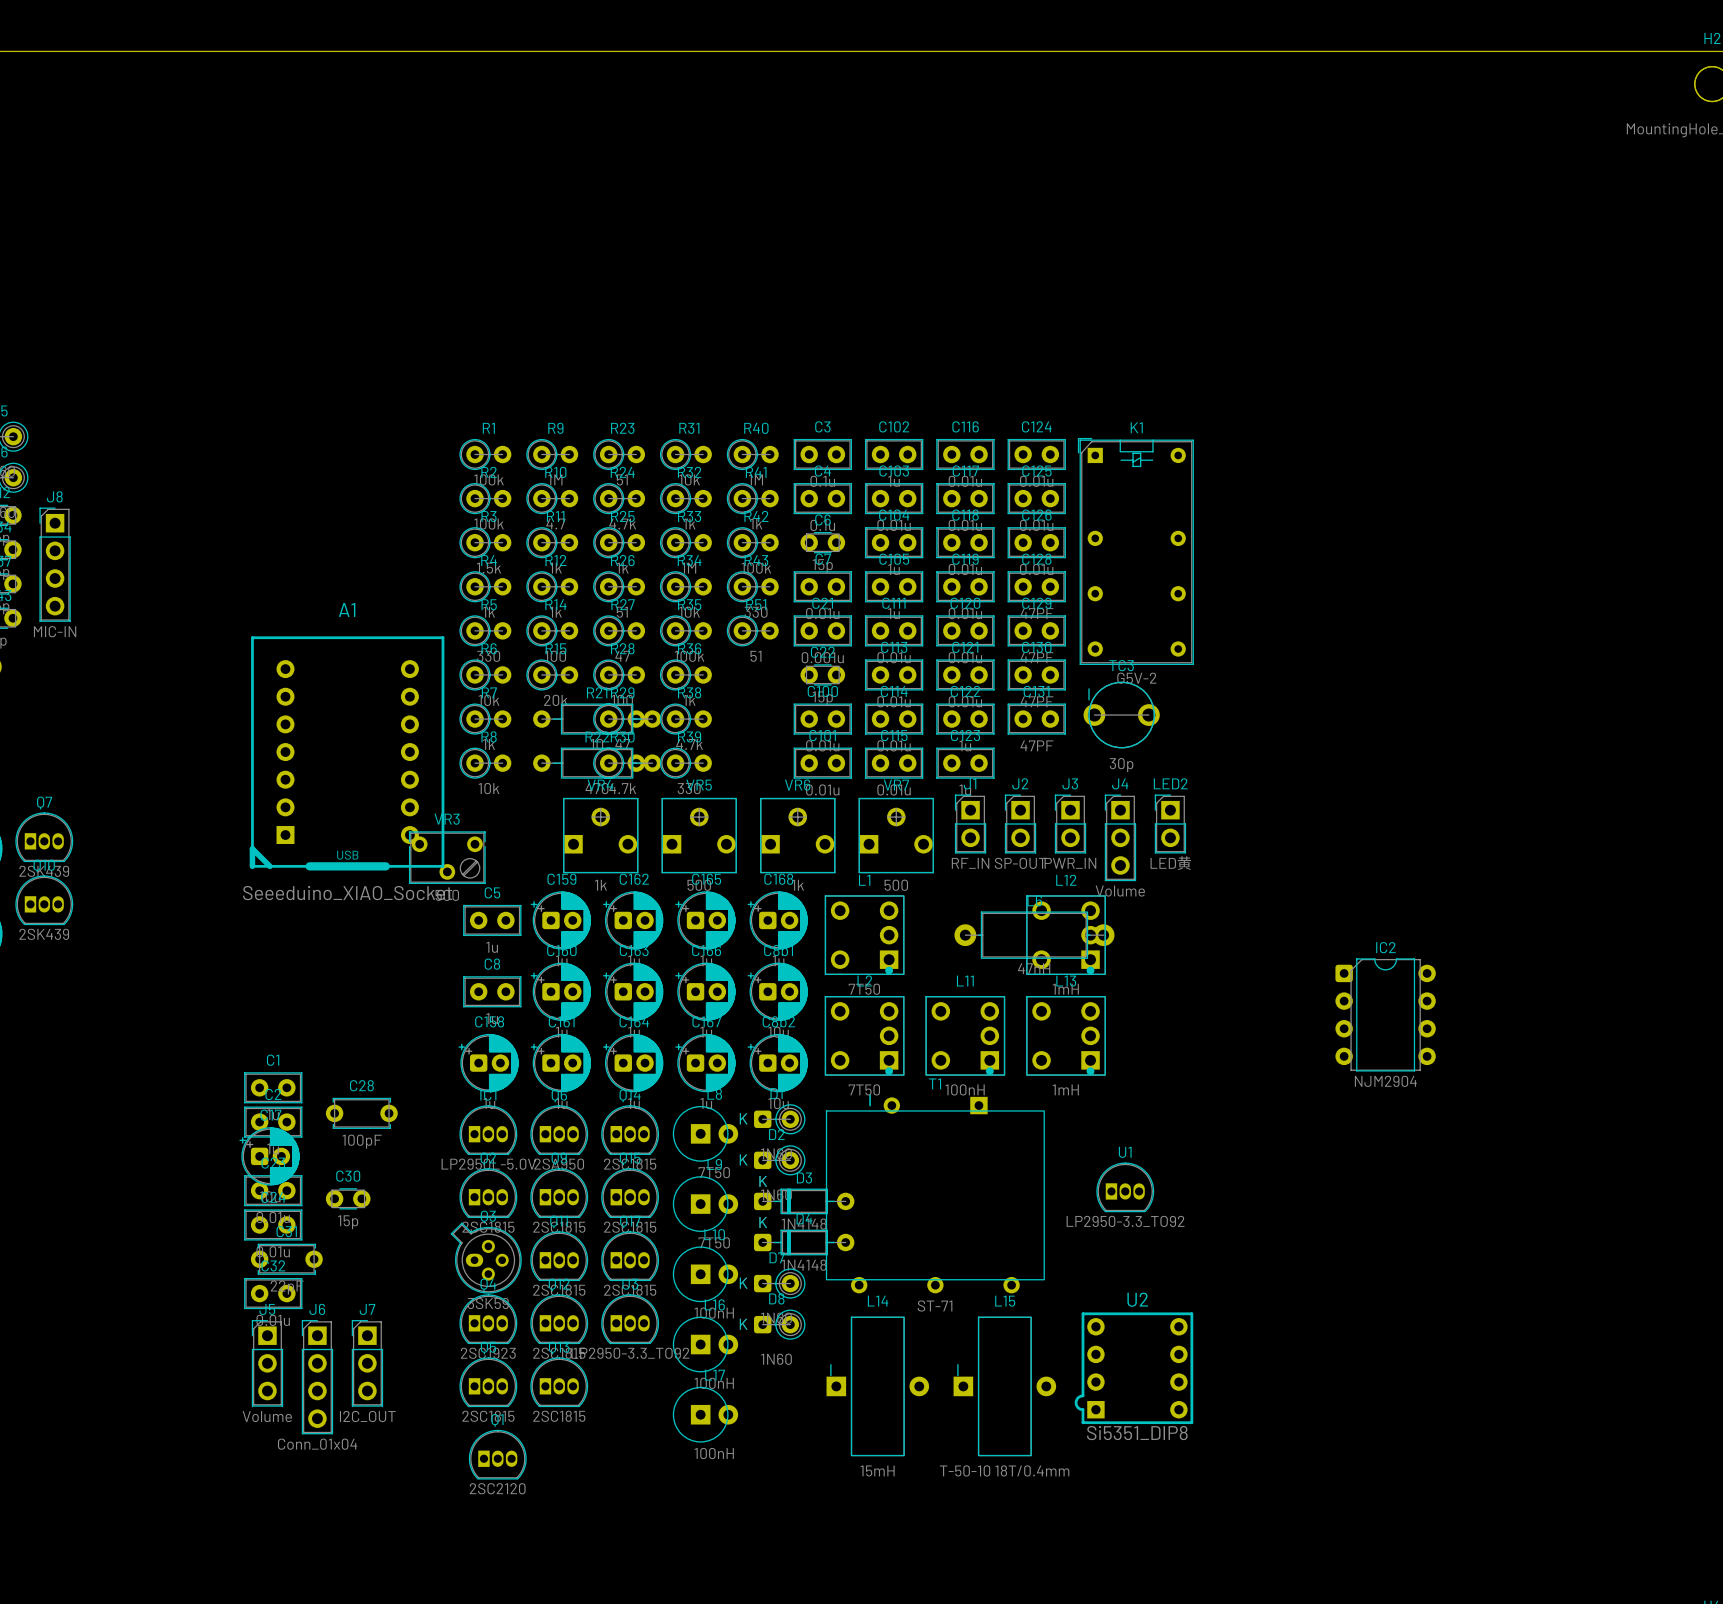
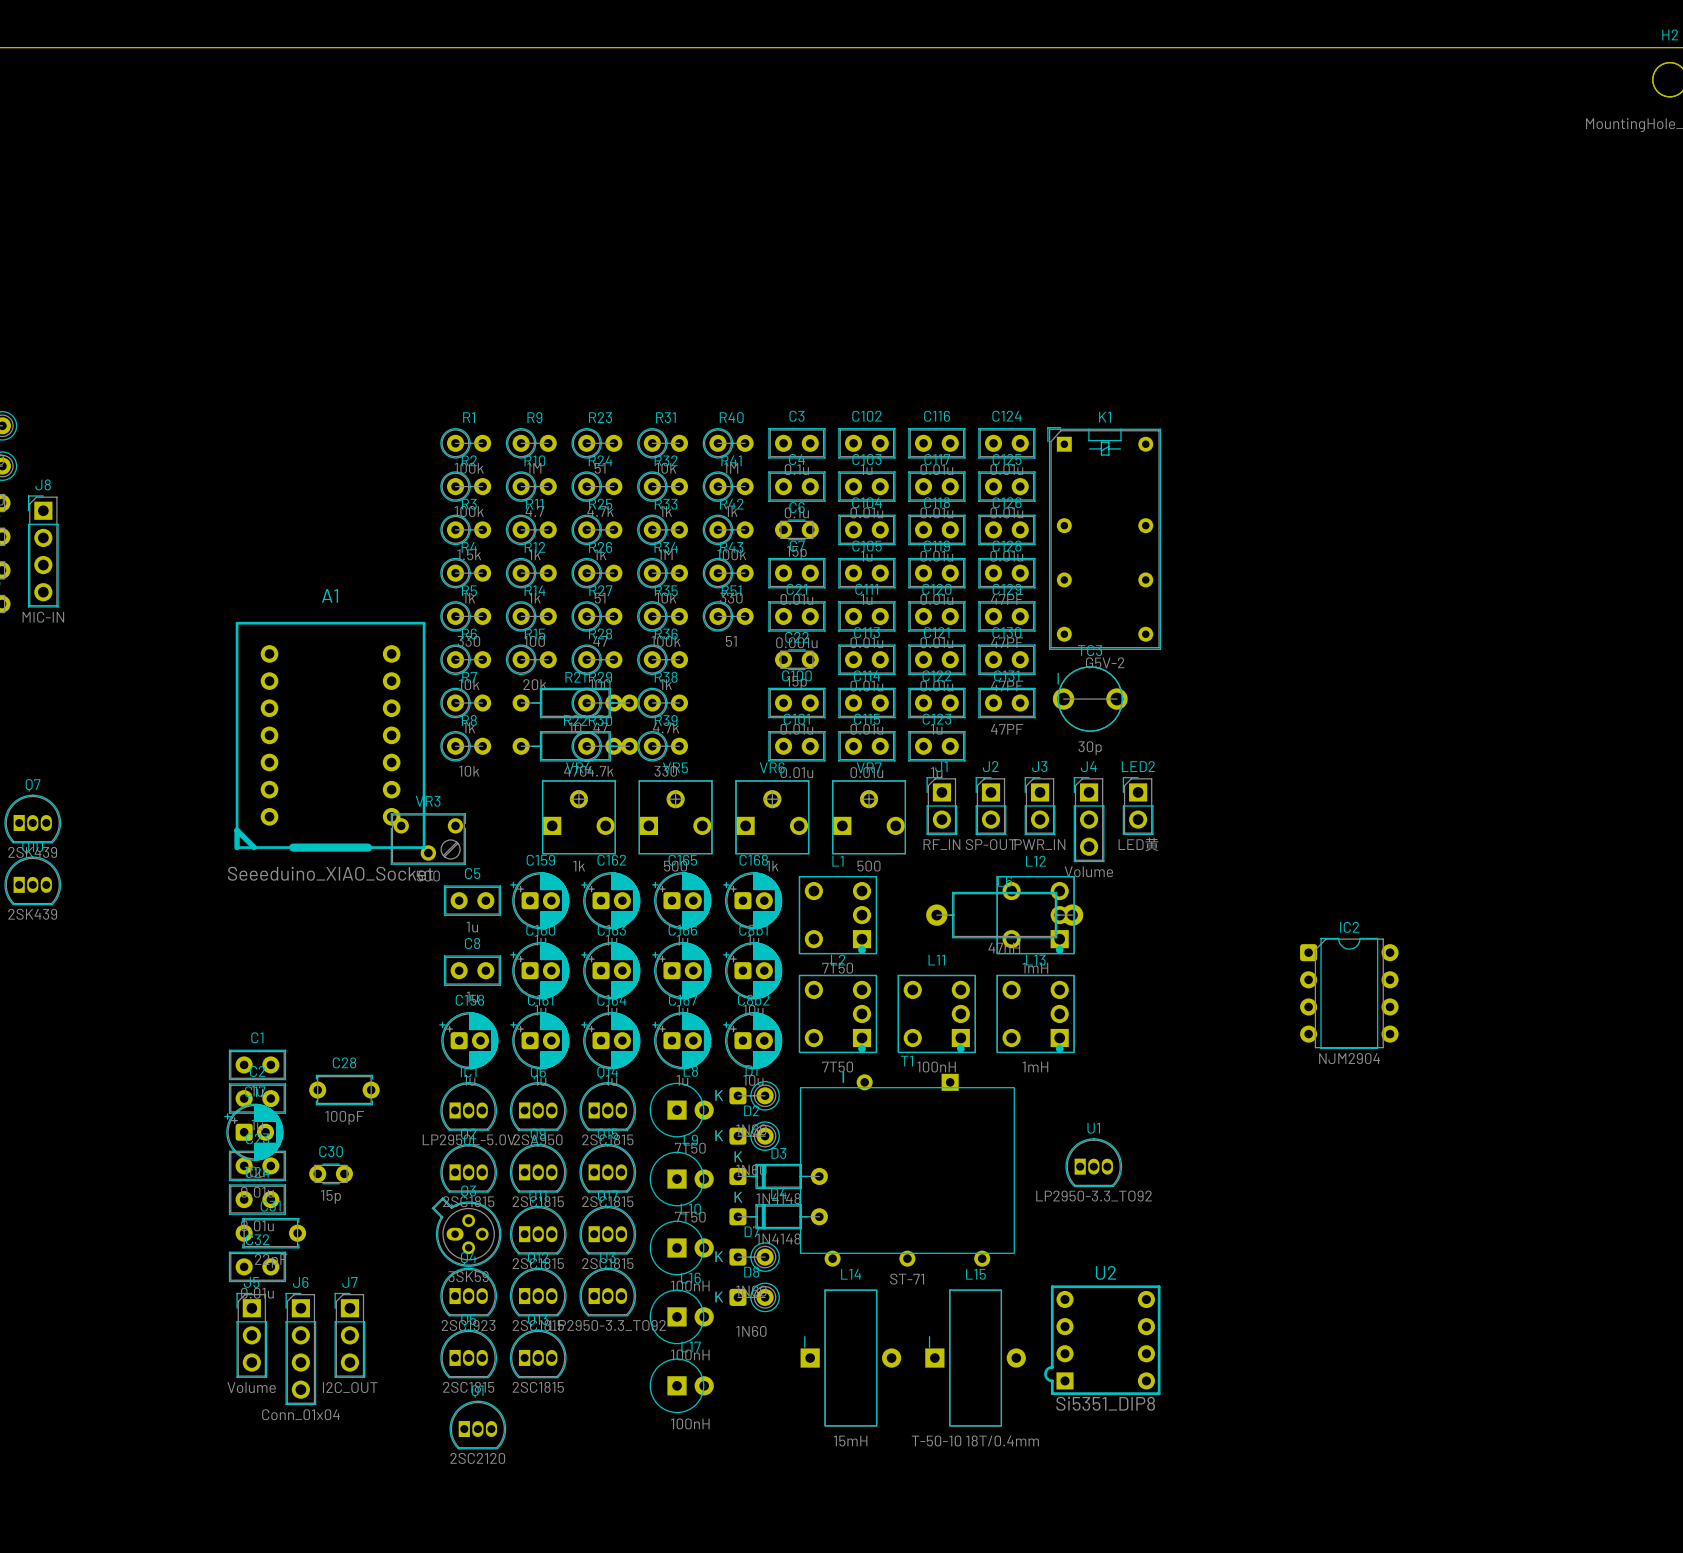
A1 footprint: [249, 636, 445, 871] -> [234, 621, 426, 852]

